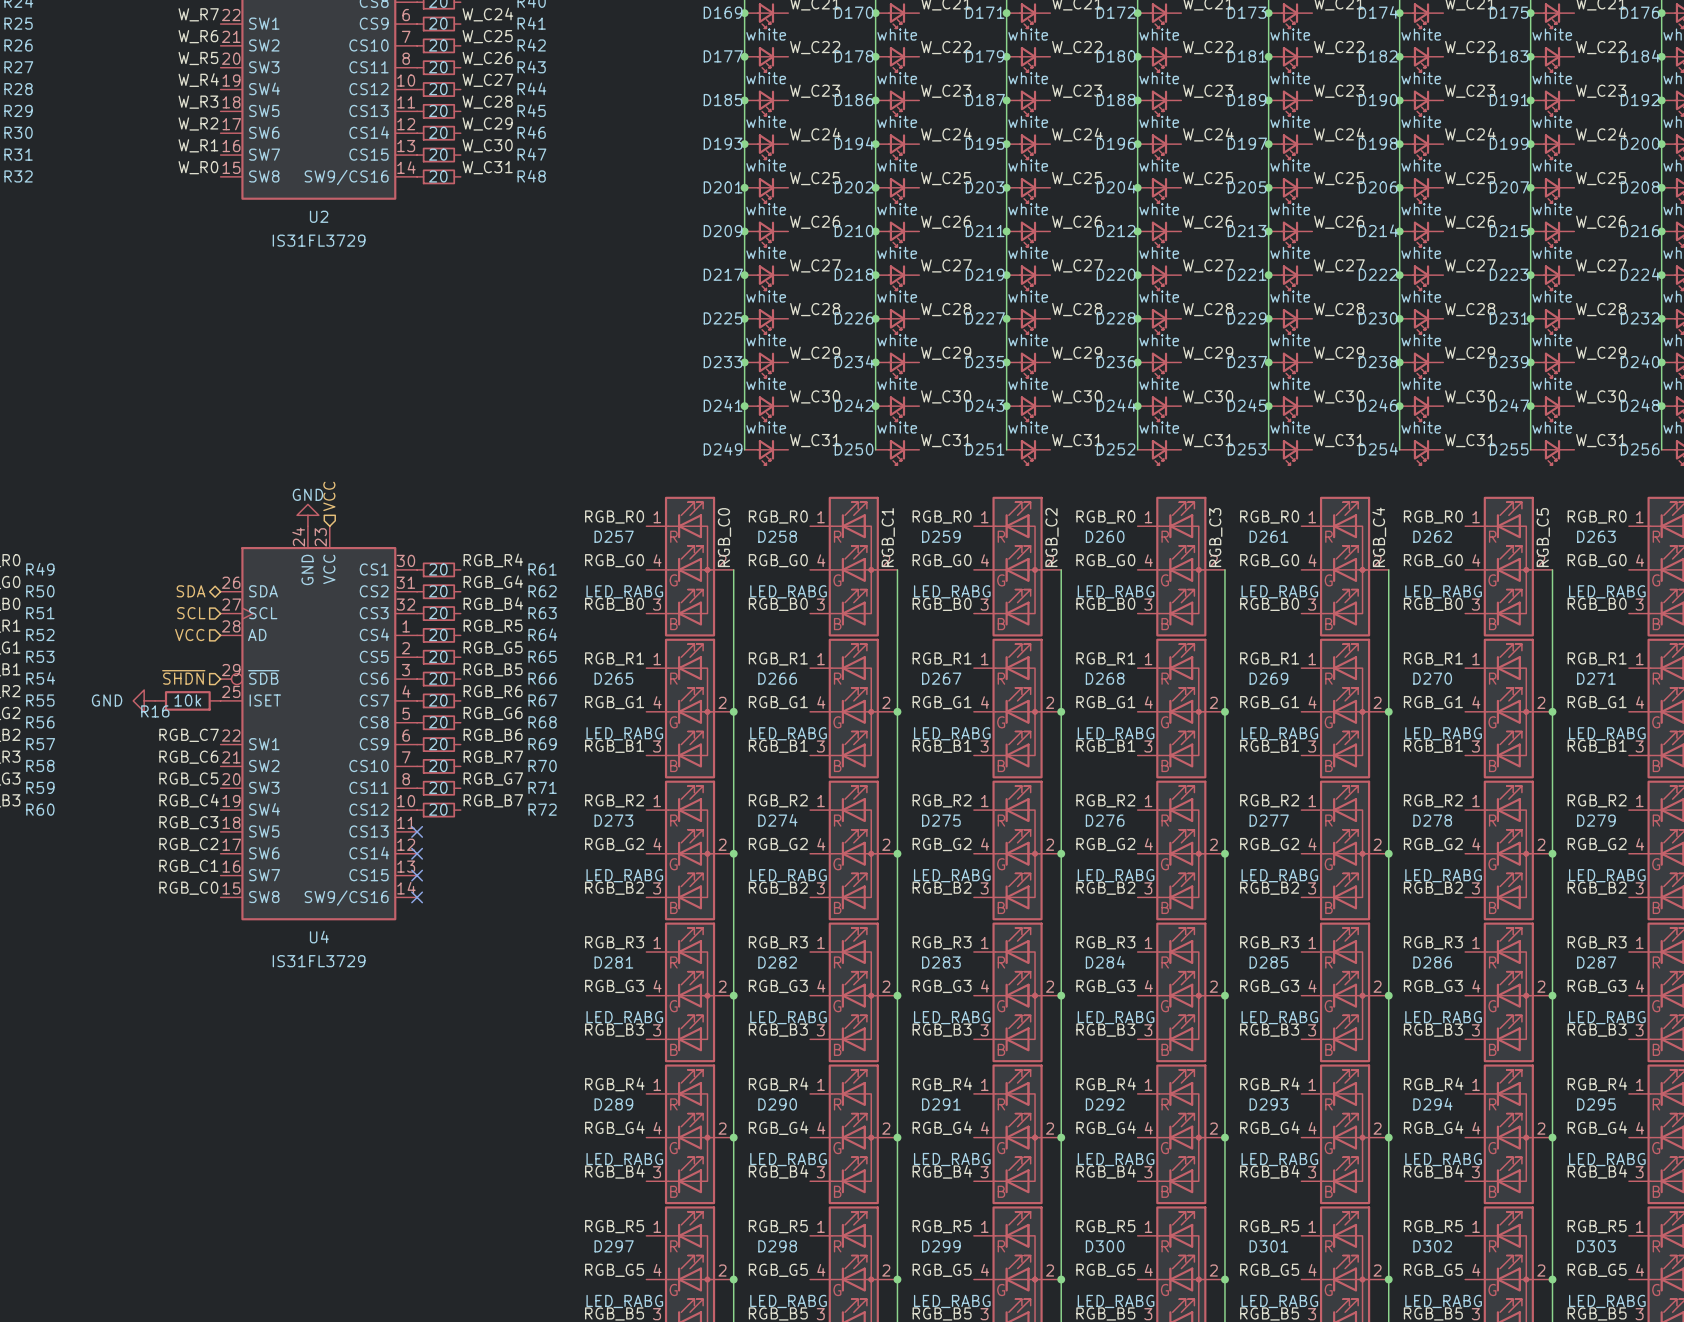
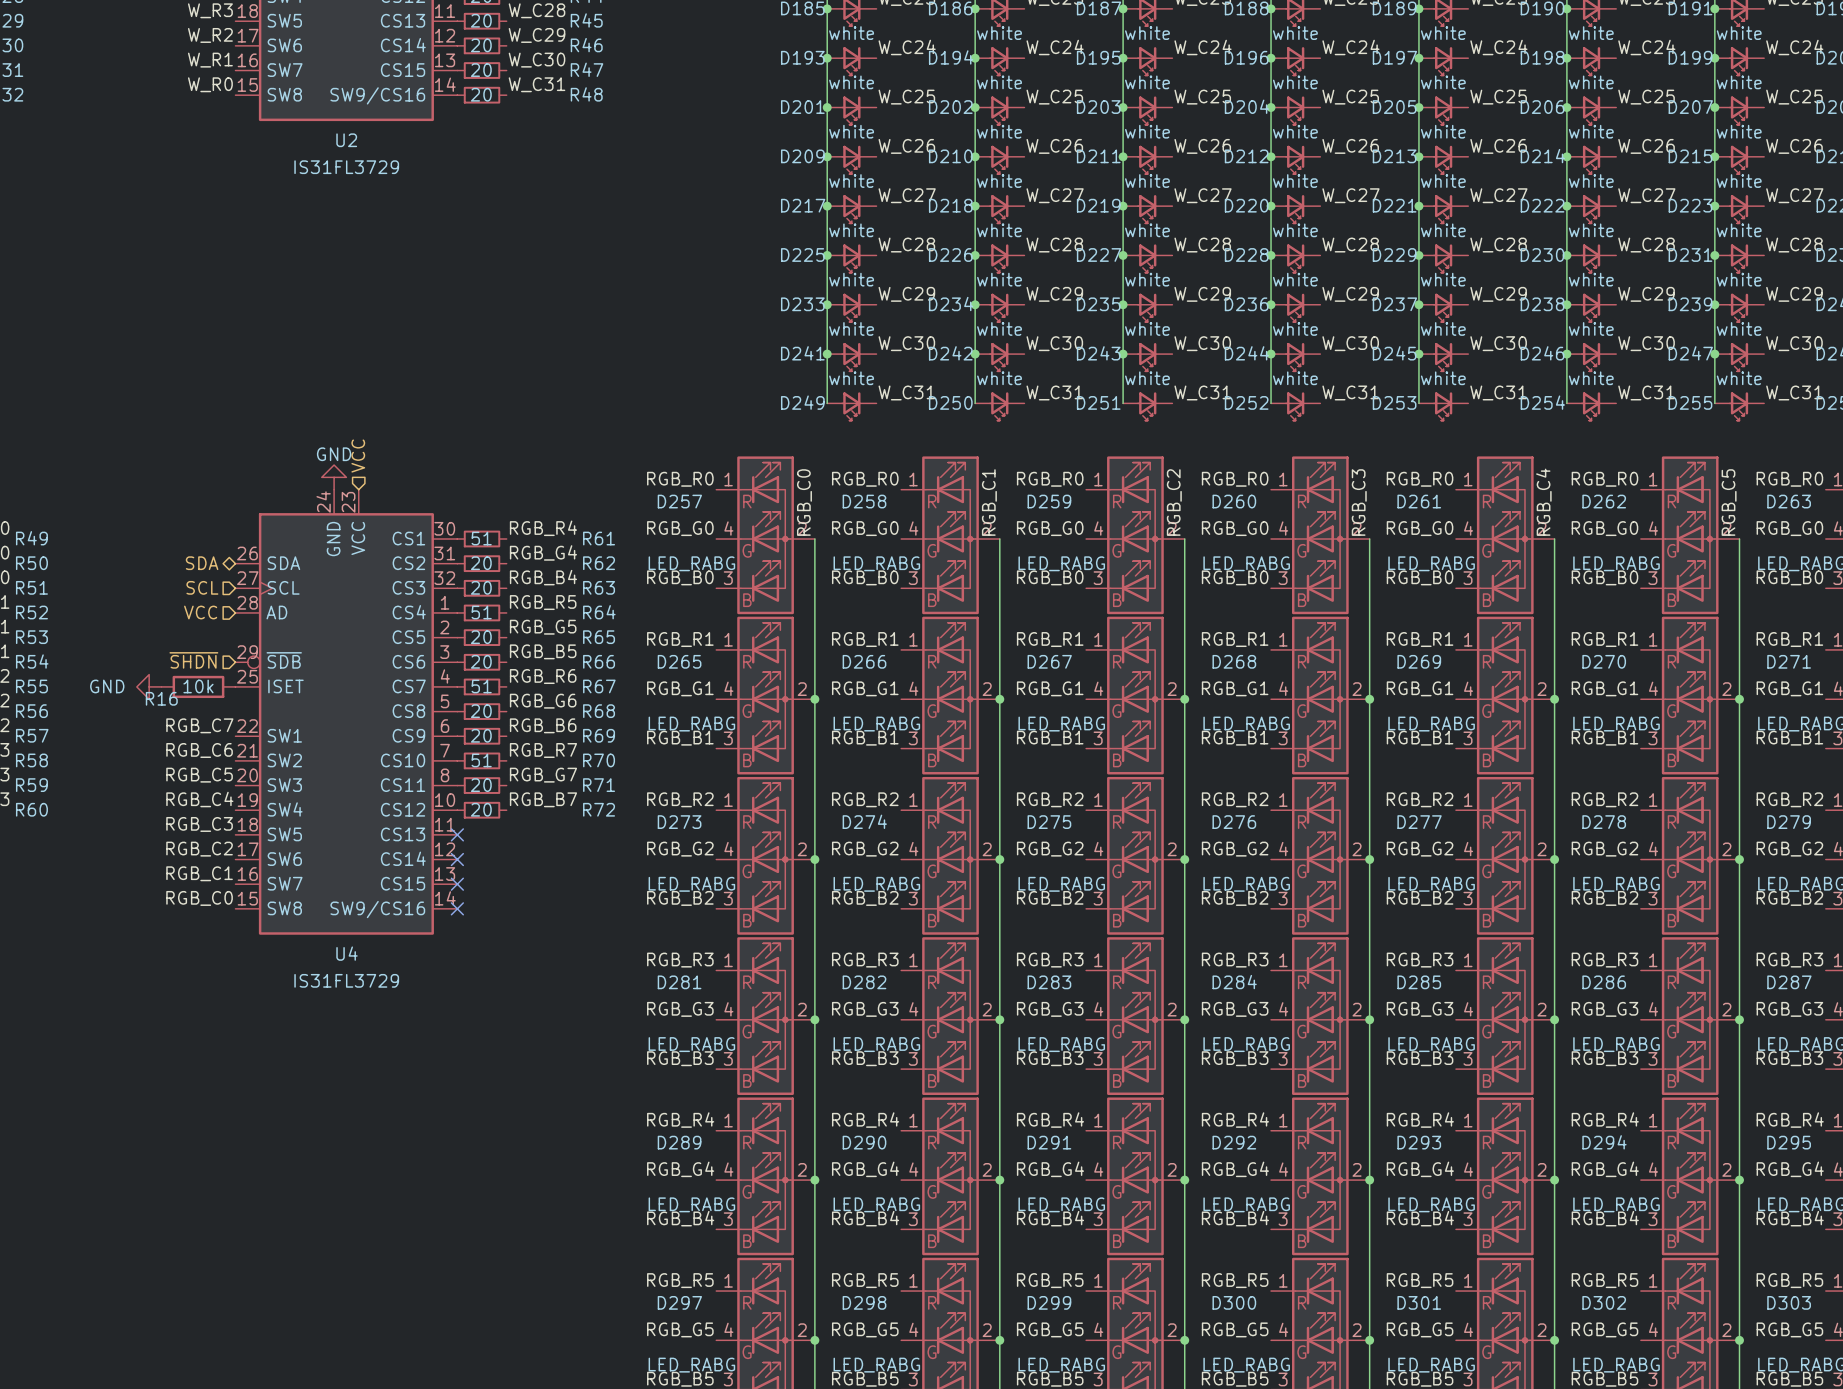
R61 value: 20 (438, 569) -> 51 (481, 538)
R64 value: 20 (438, 634) -> 51 (481, 612)
R67 value: 20 (438, 700) -> 51 (481, 686)
R70 value: 20 (438, 766) -> 51 (481, 760)

